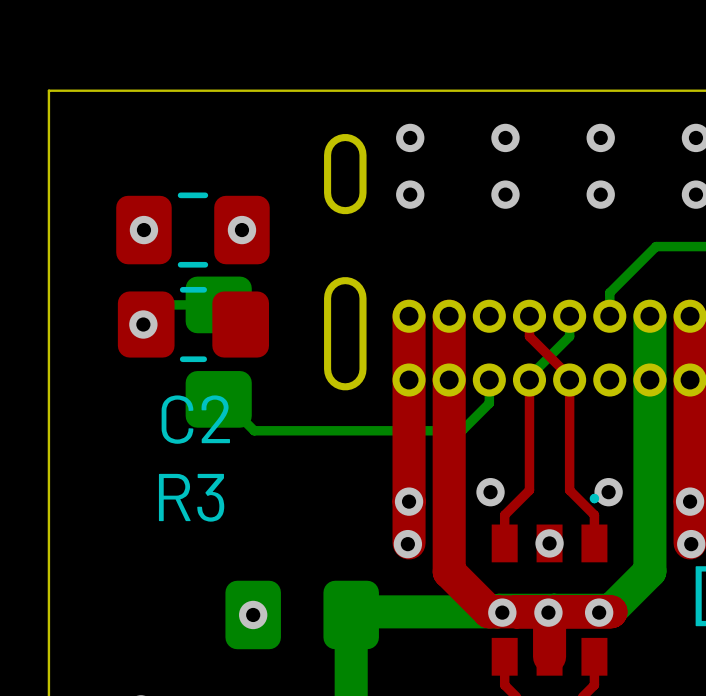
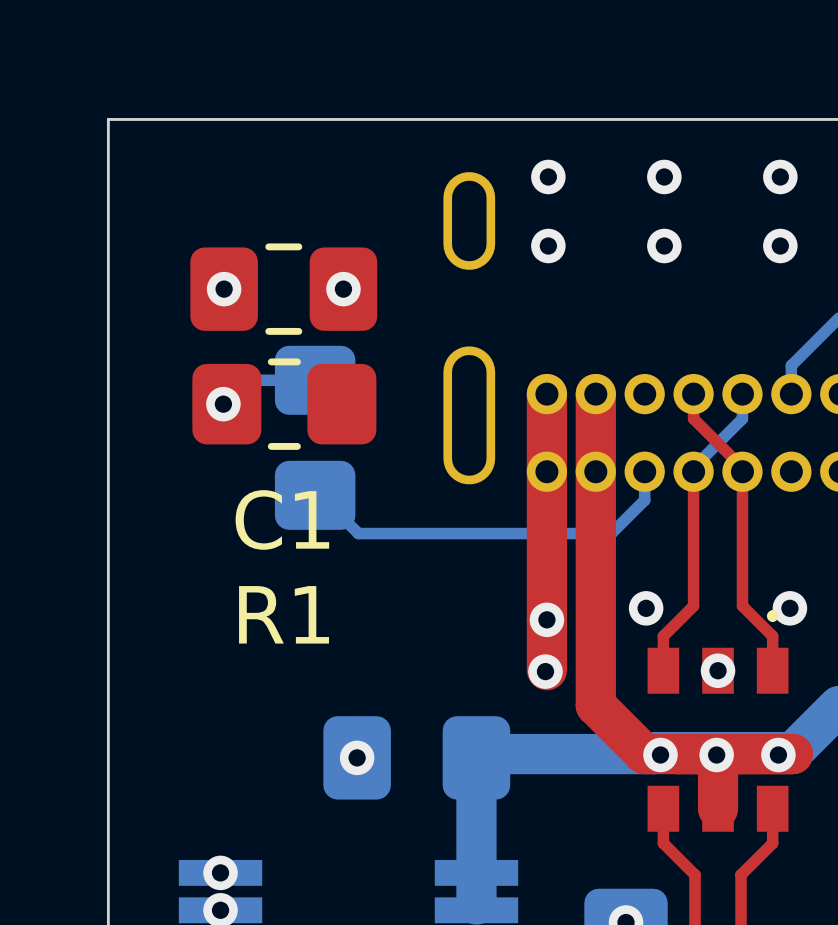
C2 name: C2 (195, 419) -> C1 (282, 519)
R3 name: R3 (191, 497) -> R1 (284, 614)

